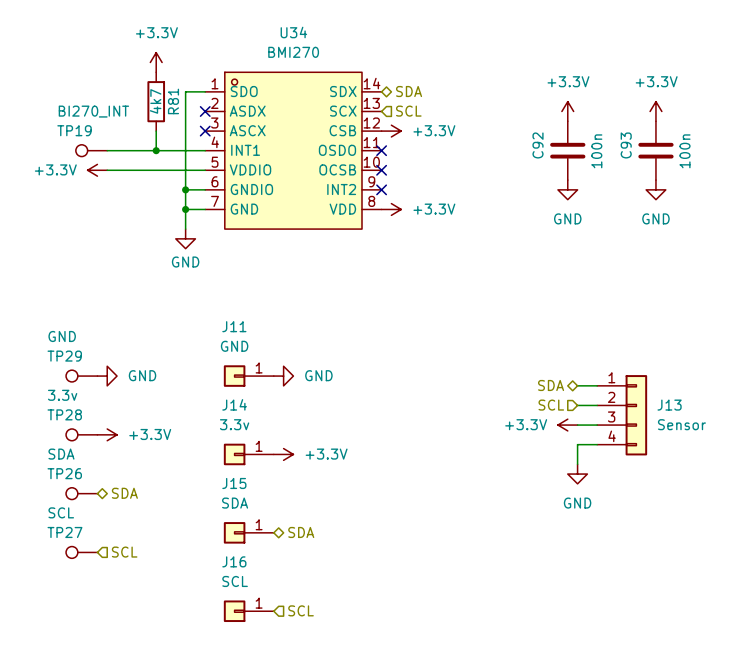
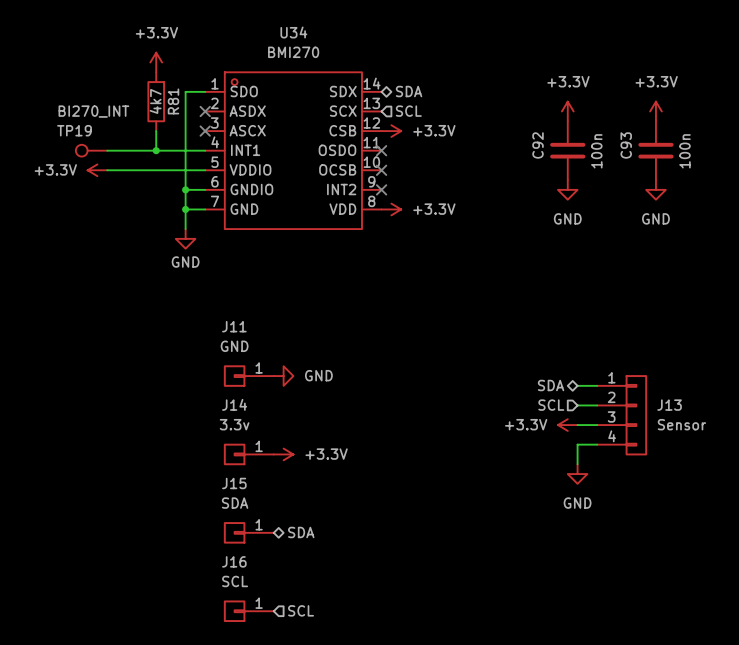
TP29: GND (81, 376) -> none
power symbol: GND (107, 376) -> none
TP28: 3.3v (81, 434) -> none
power symbol: +3.3V (107, 434) -> none
TP26: SDA (81, 493) -> none
hierarchical label: SDA (124, 493) -> none
TP27: SCL (81, 552) -> none
hierarchical label: SCL (124, 552) -> none

